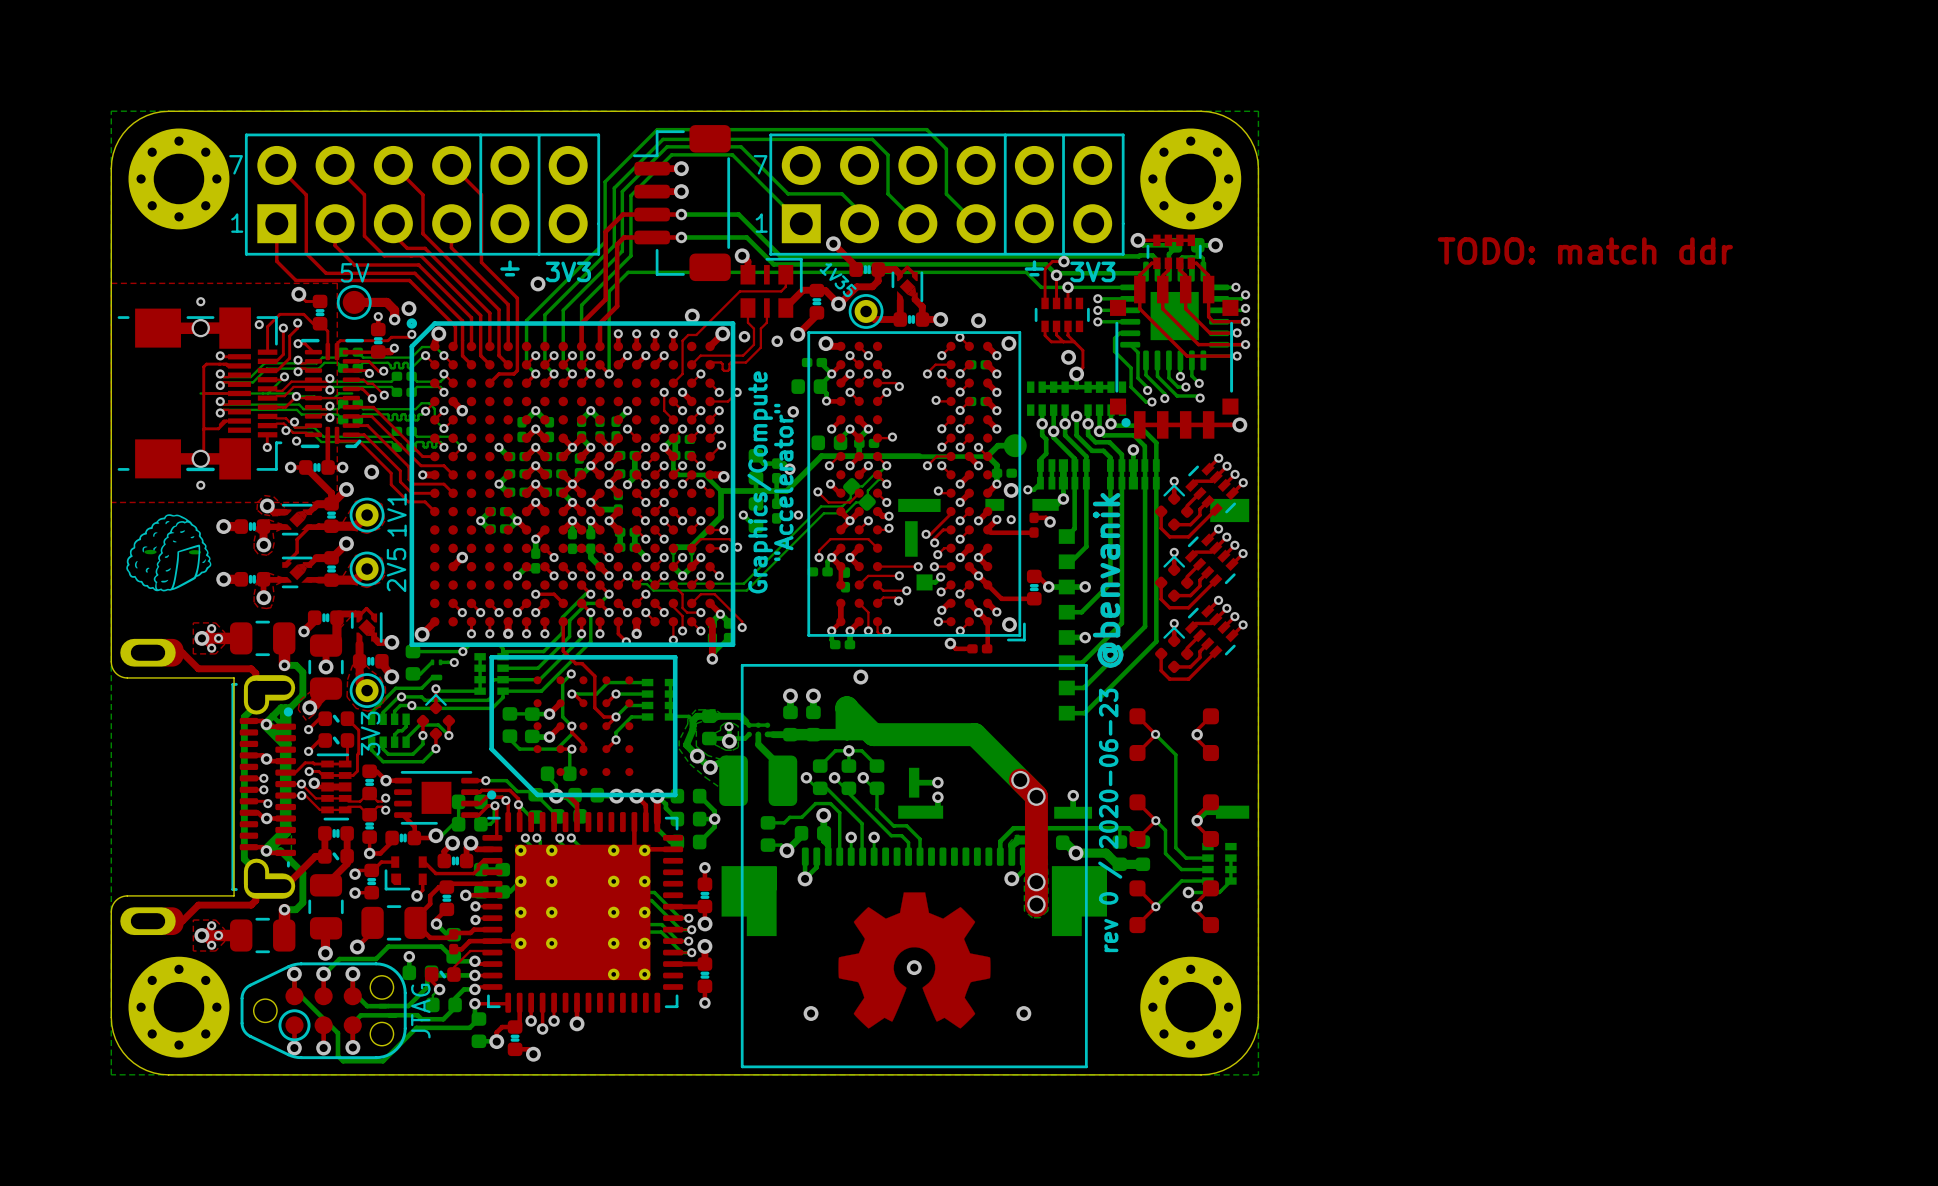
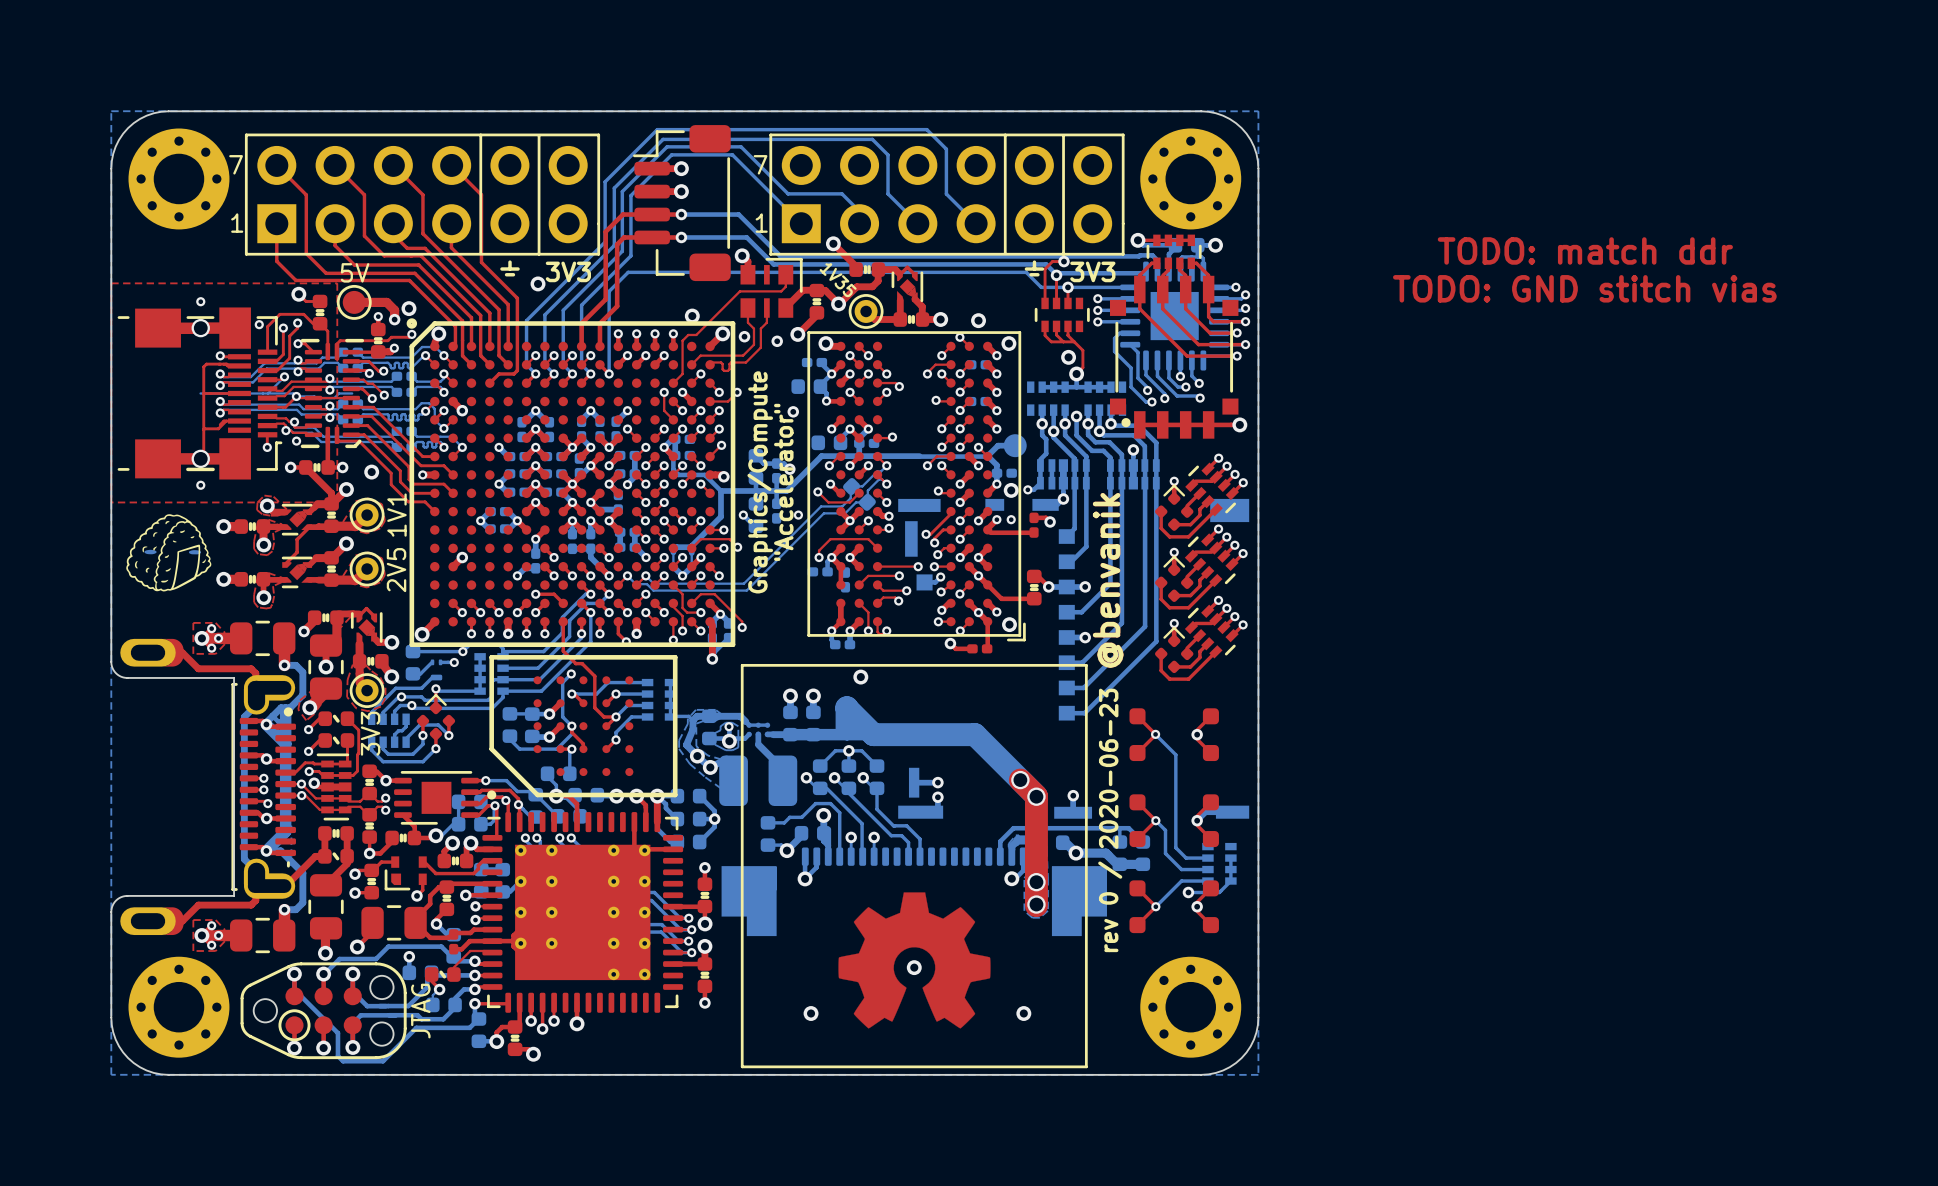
text: none -> TODO: GND stitch vias (1584, 288)

